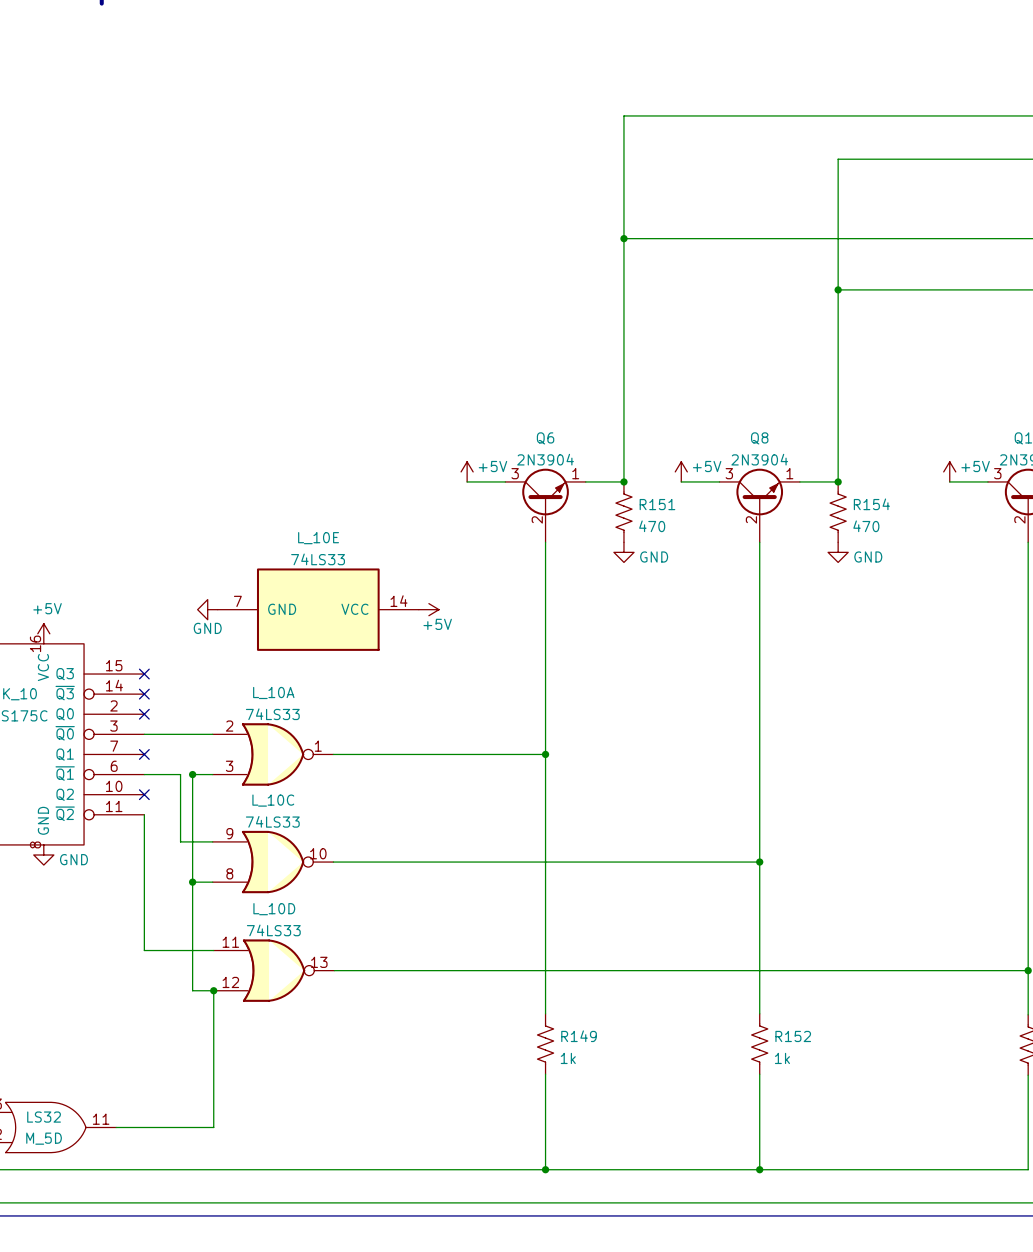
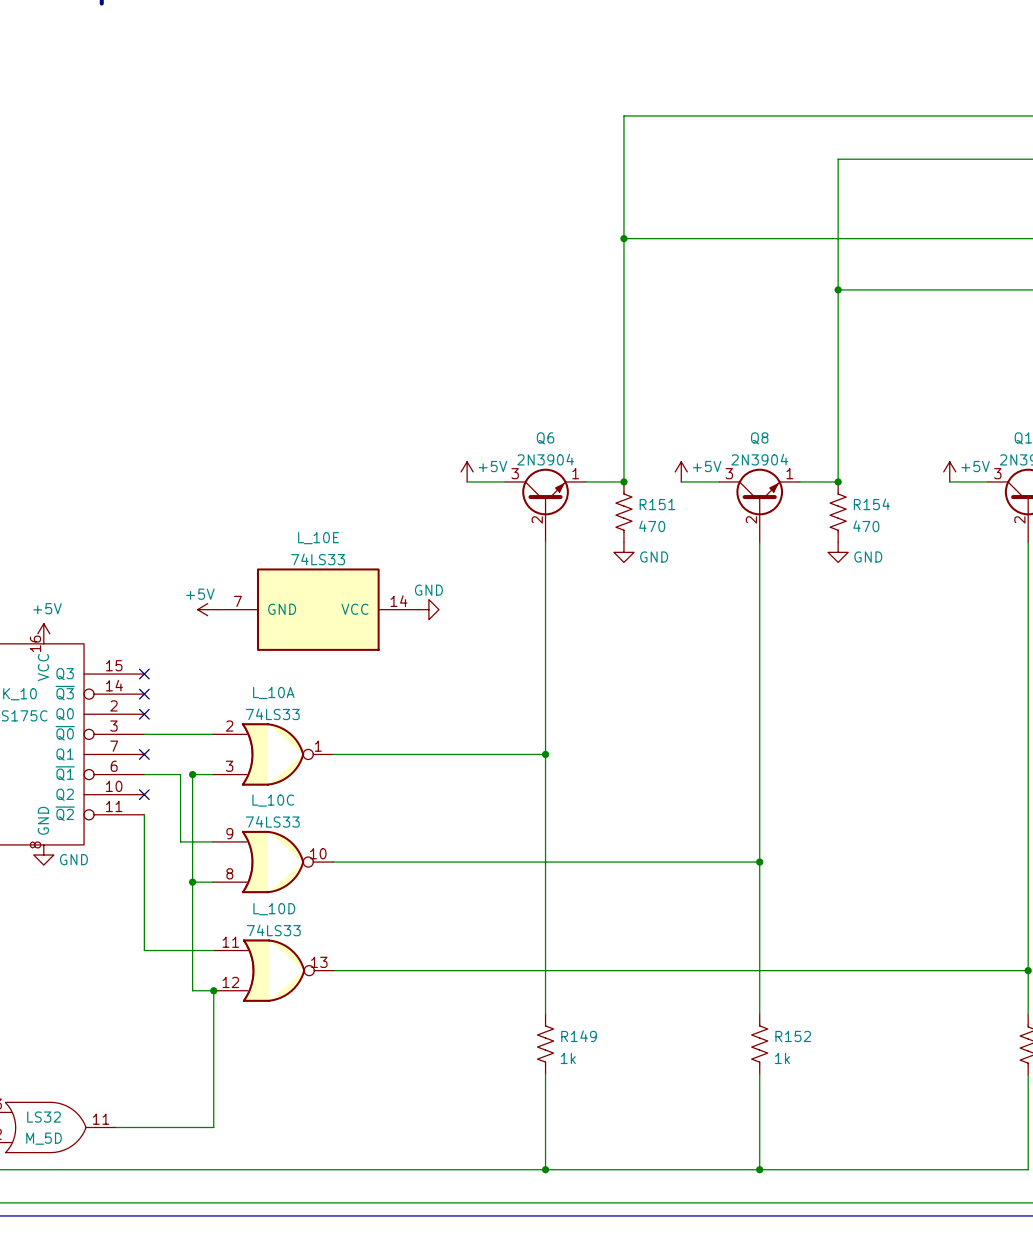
power symbol: GND (207, 609) -> +5V (207, 609)
power symbol: +5V (428, 609) -> GND (428, 609)

